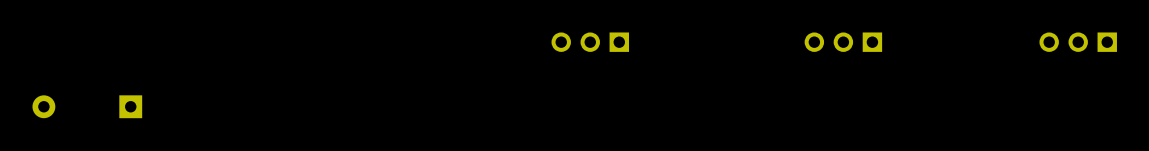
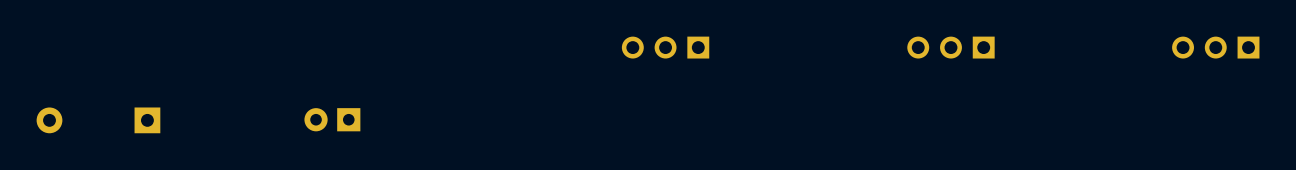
part: none -> (332, 119)

